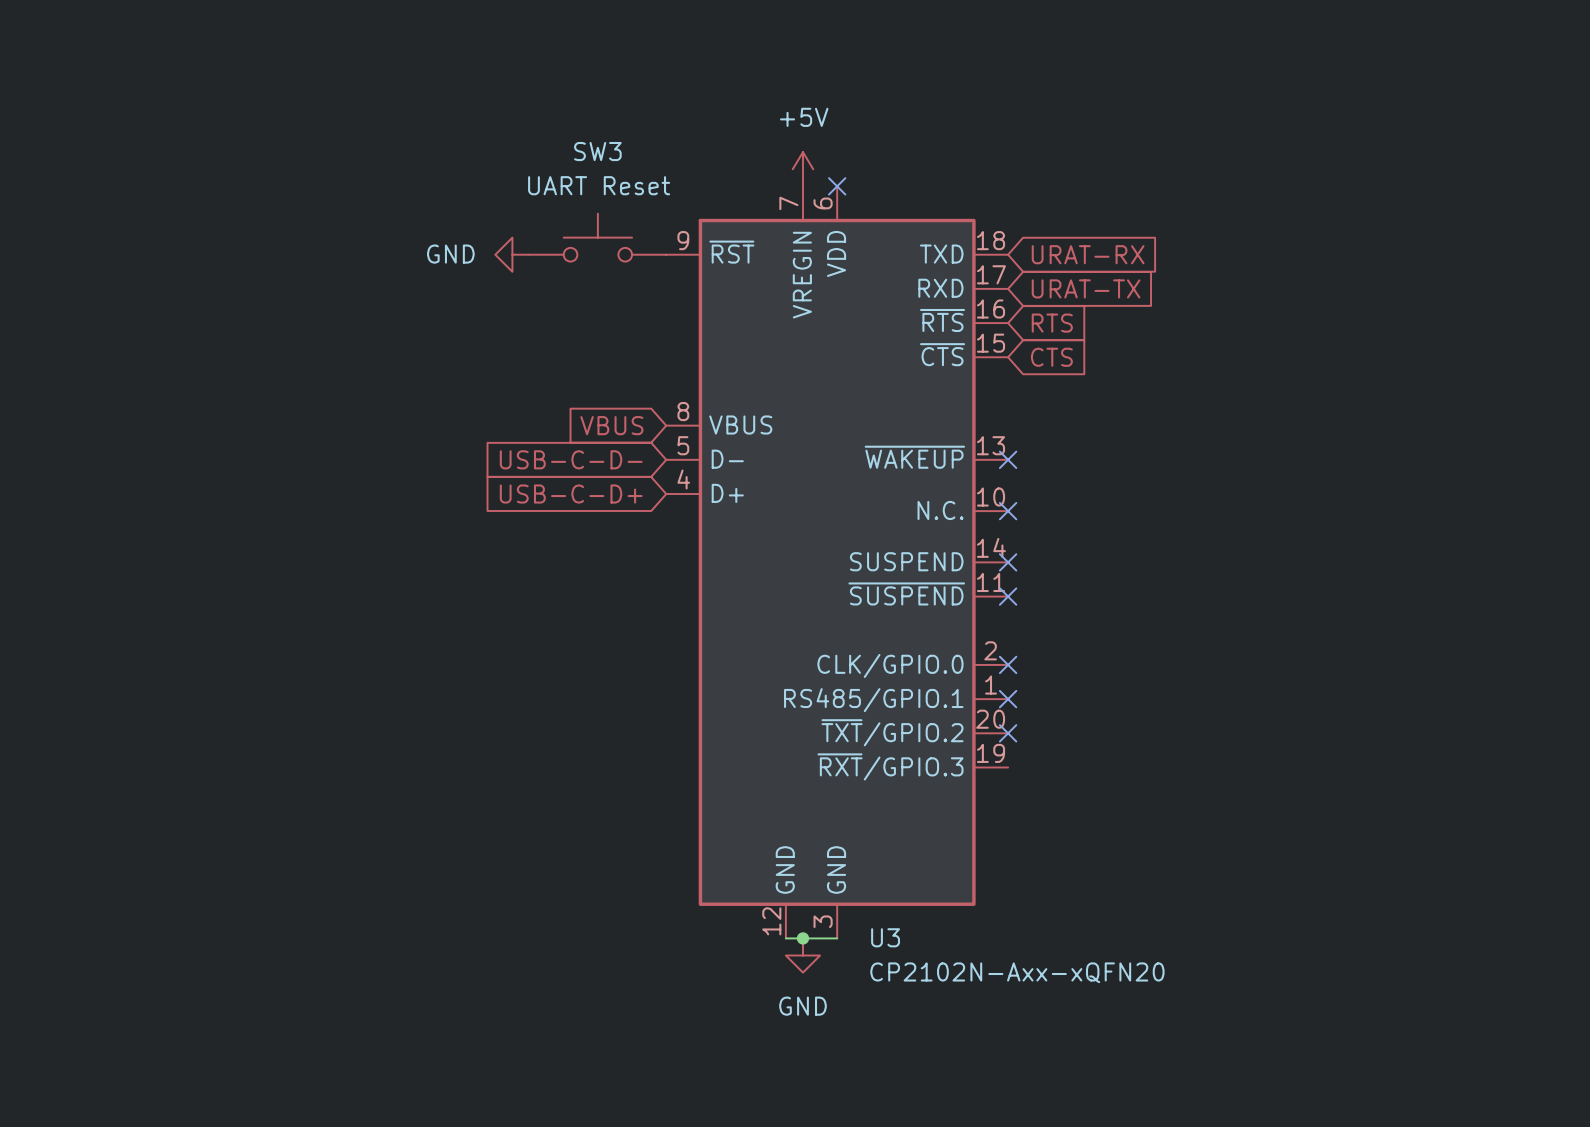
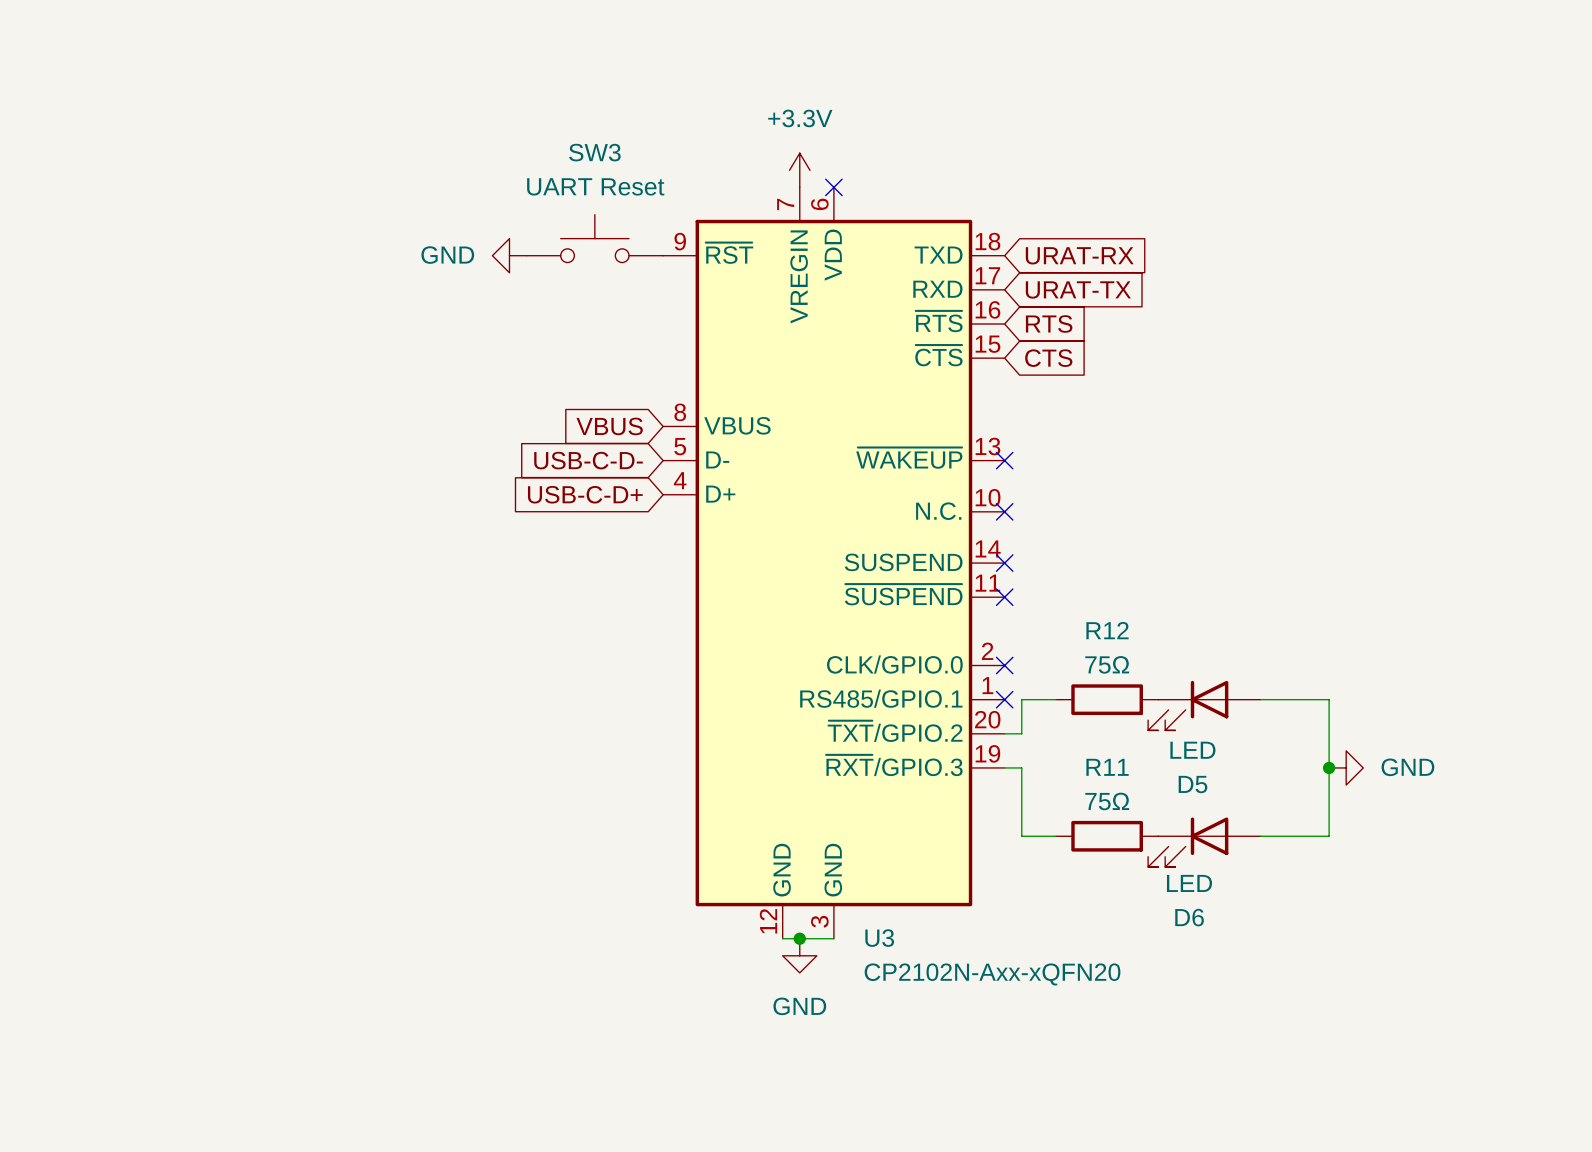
power symbol: +5V (802, 169) -> +3.3V (799, 170)
wire: none -> (1055, 699) (1021, 699) (1021, 733) (1004, 733)
R12: none -> 75Ω (1107, 699)
wire: none -> (1260, 699) (1329, 699) (1329, 836) (1260, 836)
D5: none -> LED (1204, 705)
no-connect mark: (1008, 733) -> none
wire: none -> (1004, 767) (1021, 767) (1021, 836) (1055, 836)
junction: none -> (1329, 767)
power symbol: none -> GND (1346, 767)
R11: none -> 75Ω (1107, 836)
D6: none -> LED (1204, 842)

